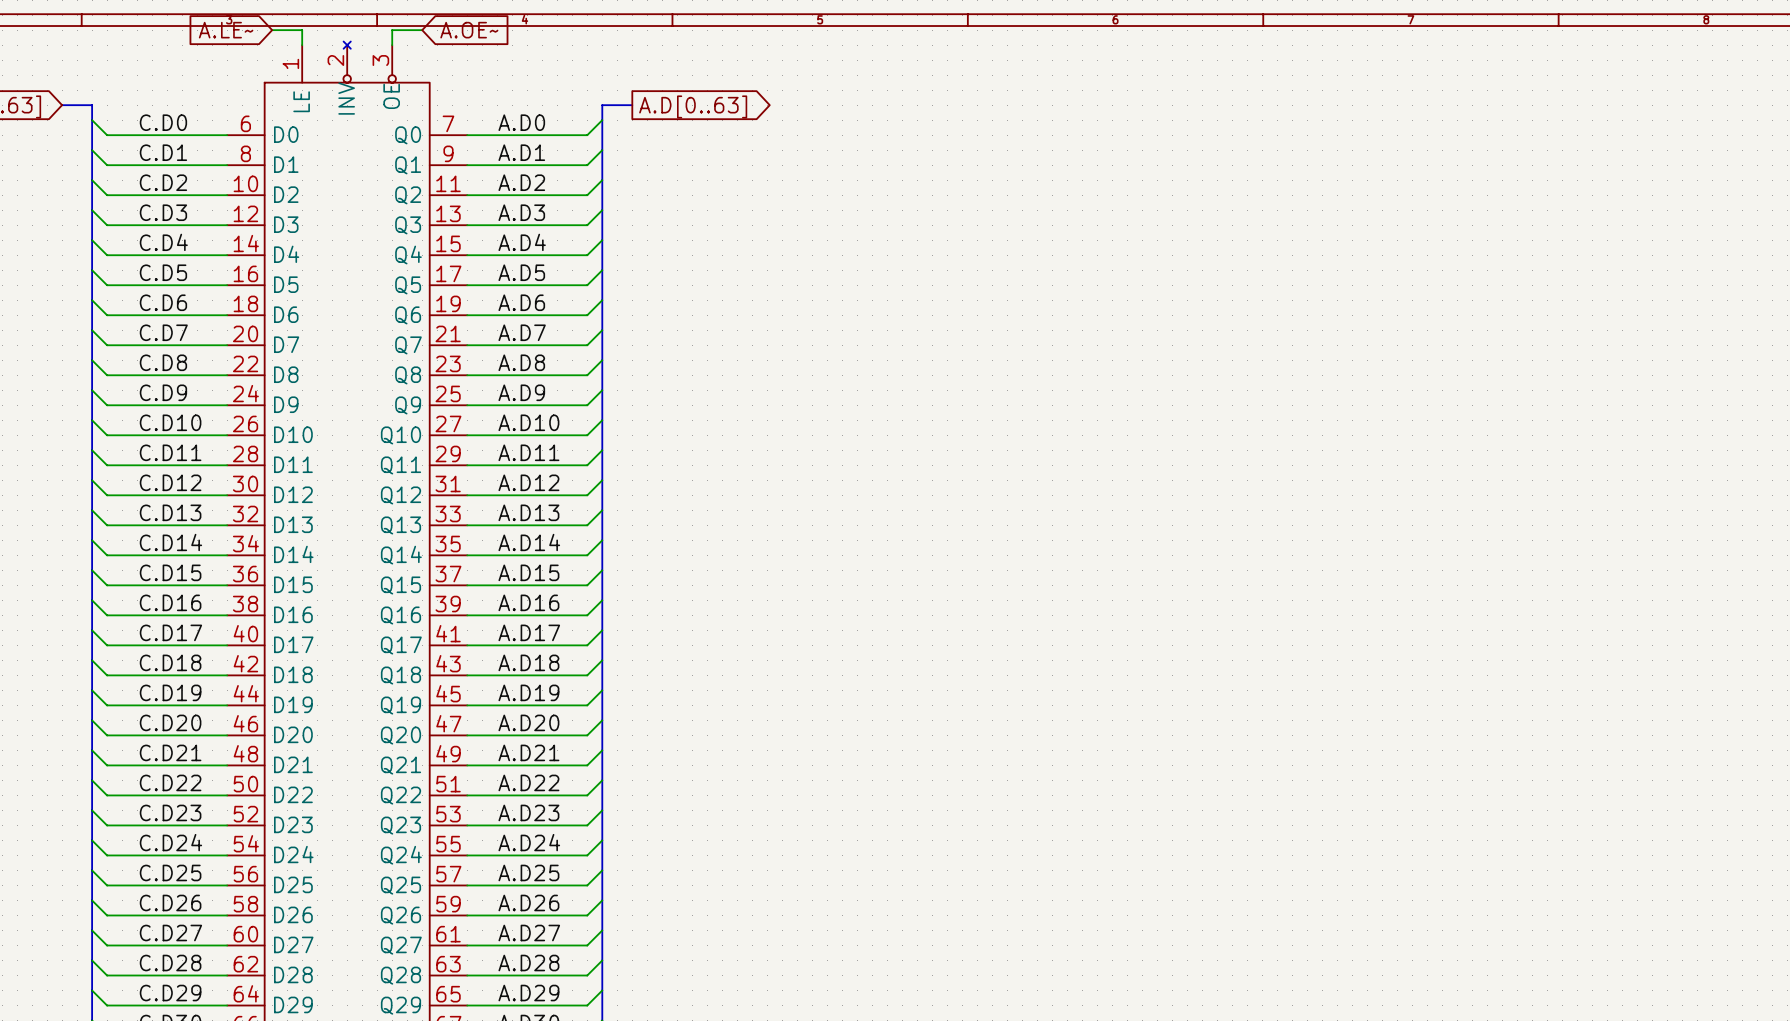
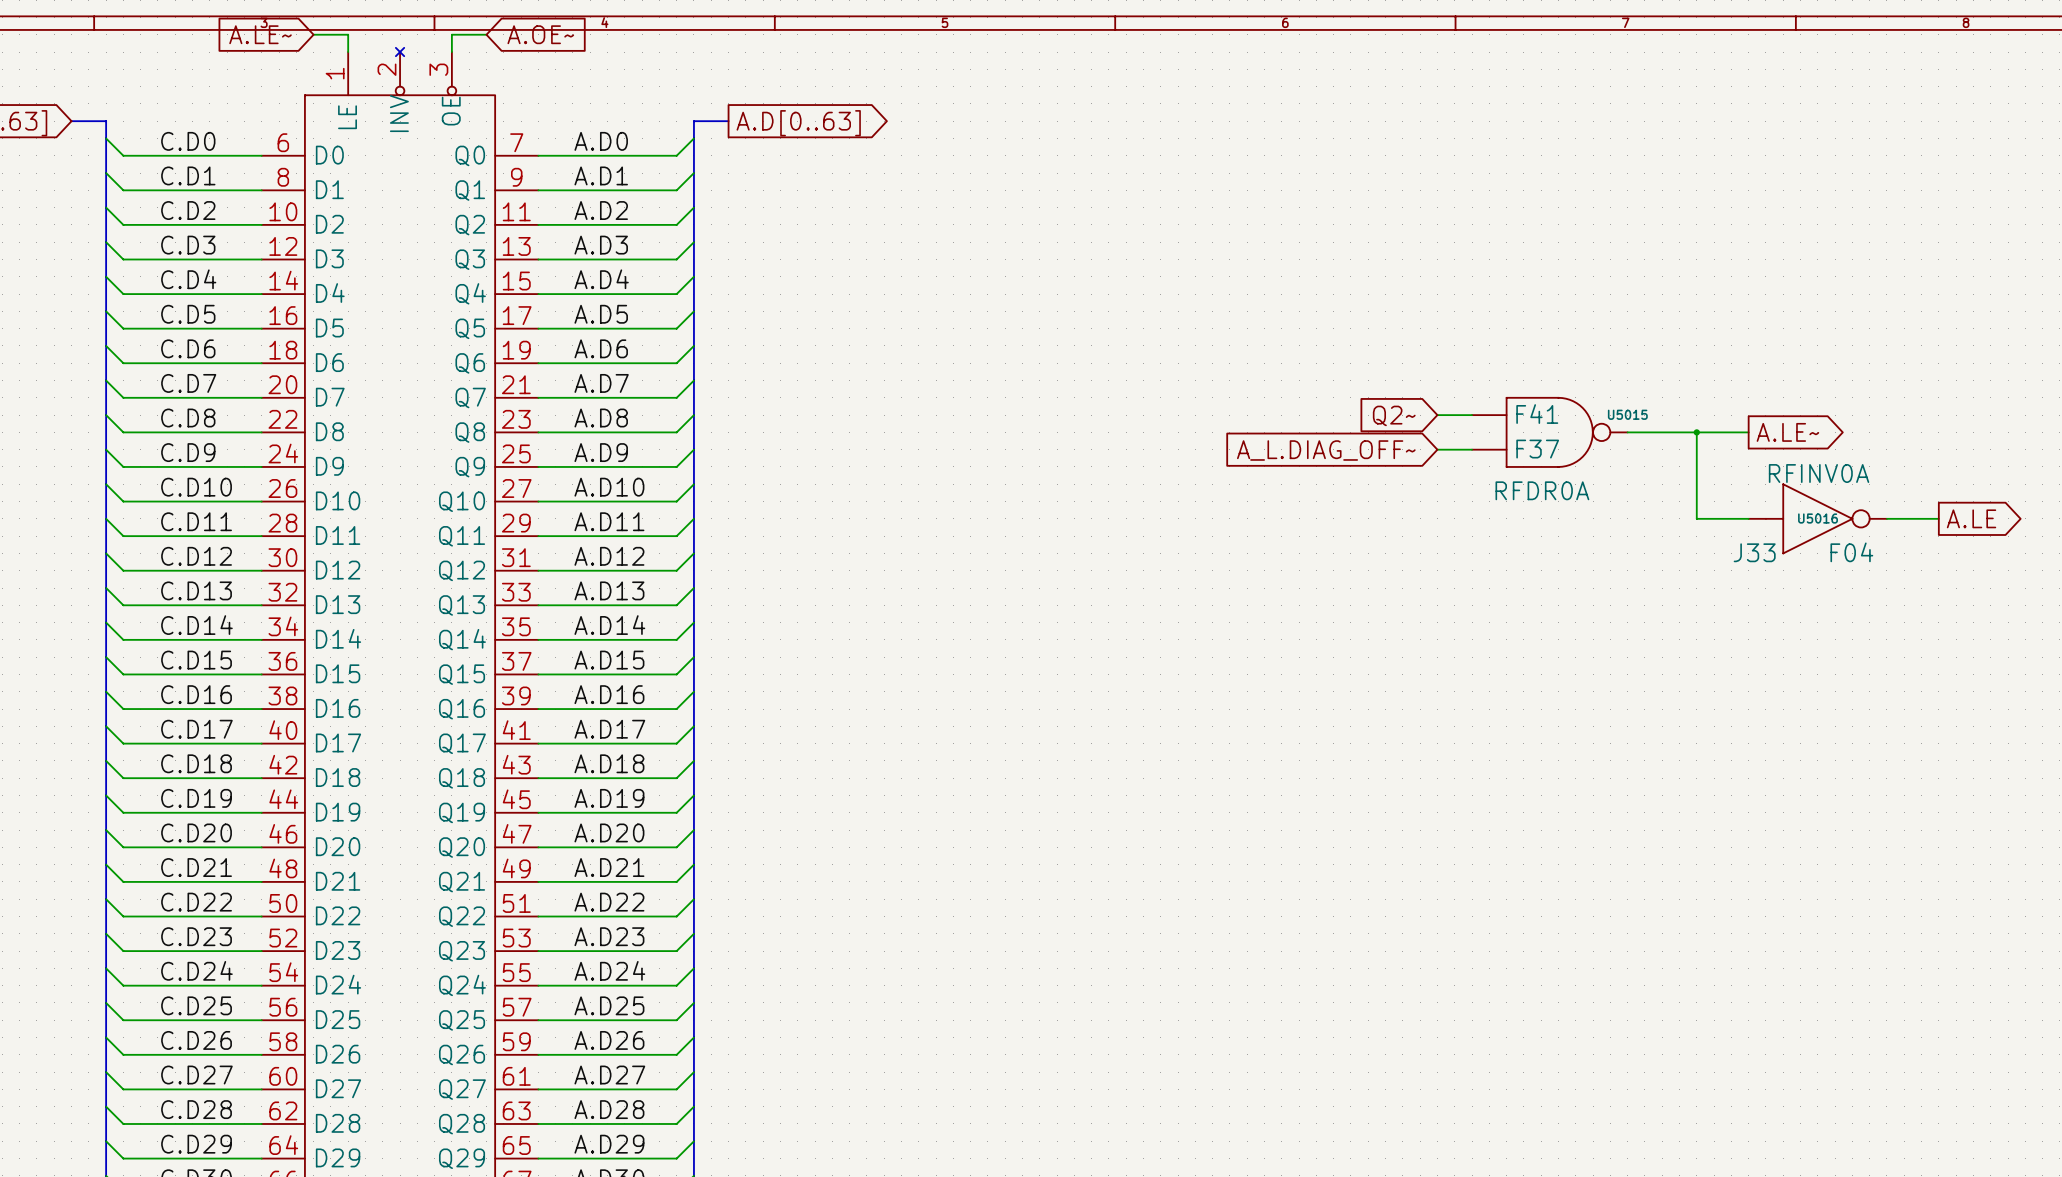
global label: none -> Q2~ (1394, 415)
wire: none -> (1437, 415) (1472, 415)
U5015: none -> F37 (1549, 432)
wire: none -> (1627, 432) (1748, 432)
wire: none -> (1696, 432) (1696, 518) (1748, 518)
junction: none -> (1696, 432)
global label: none -> A.LE~ (1787, 432)
global label: none -> A_L.DIAG_OFF~ (1326, 450)
wire: none -> (1437, 449) (1472, 449)
U5016: none -> F04 (1817, 518)
wire: none -> (1886, 518) (1938, 518)
global label: none -> A.LE (1971, 518)

